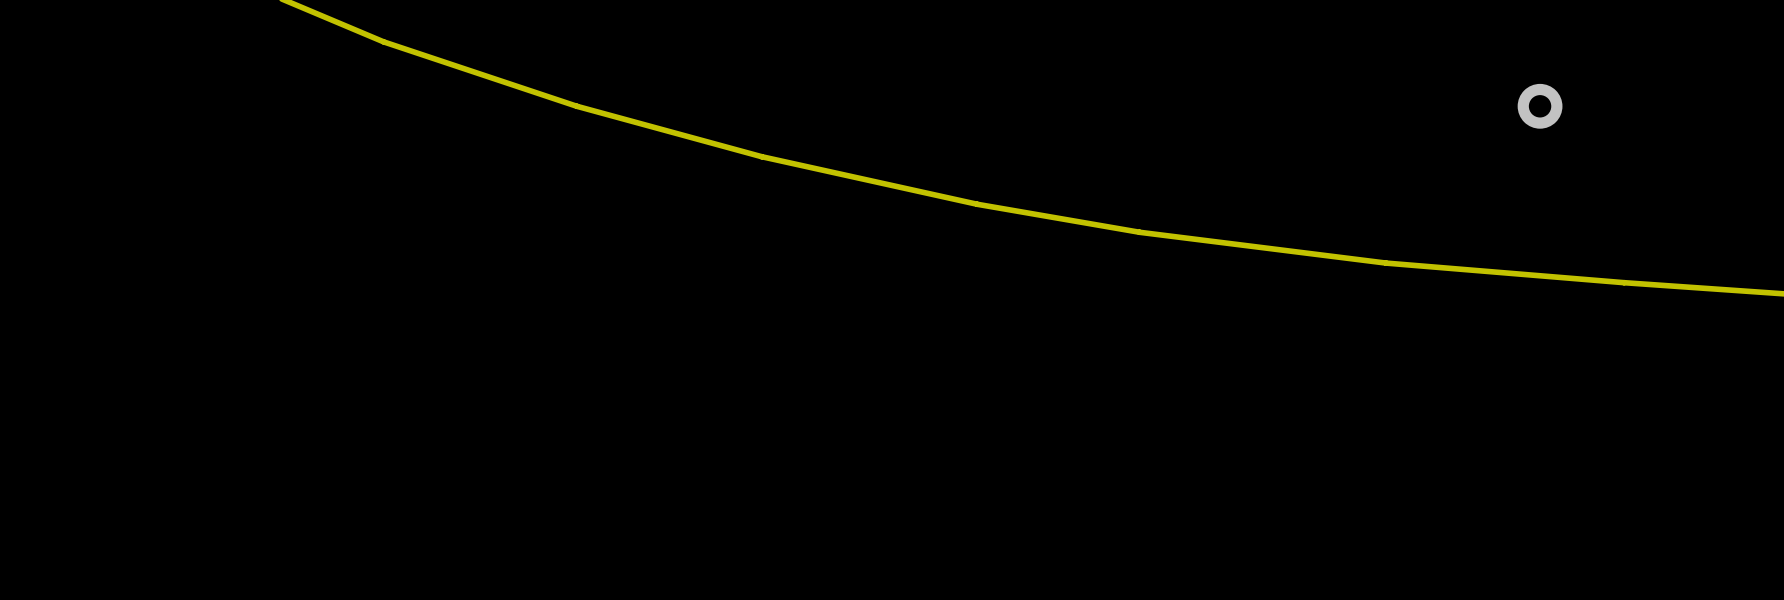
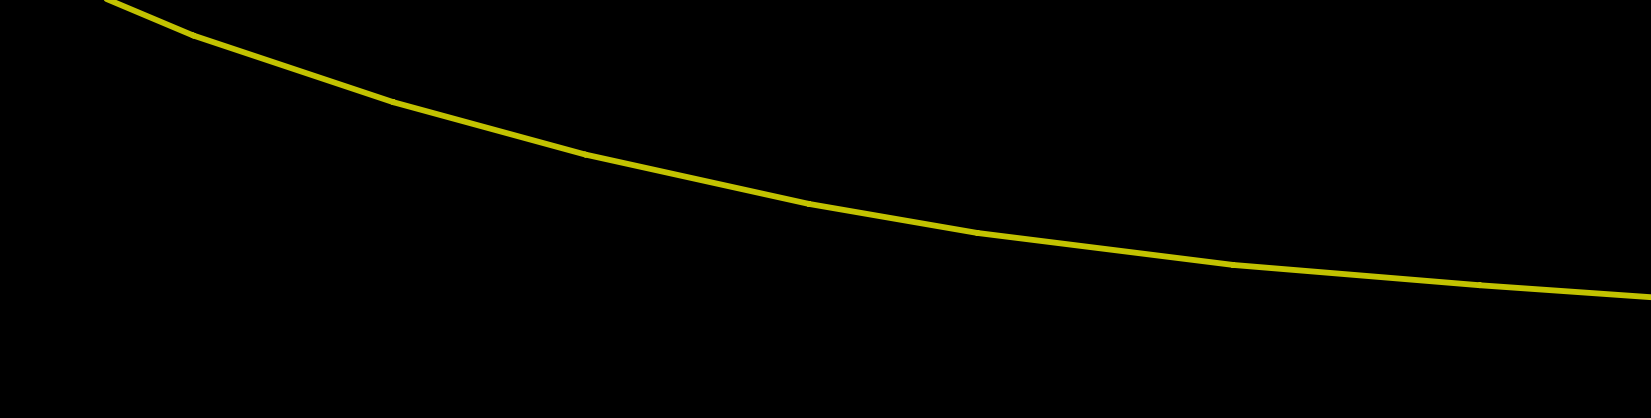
via: (1540, 106) -> none

